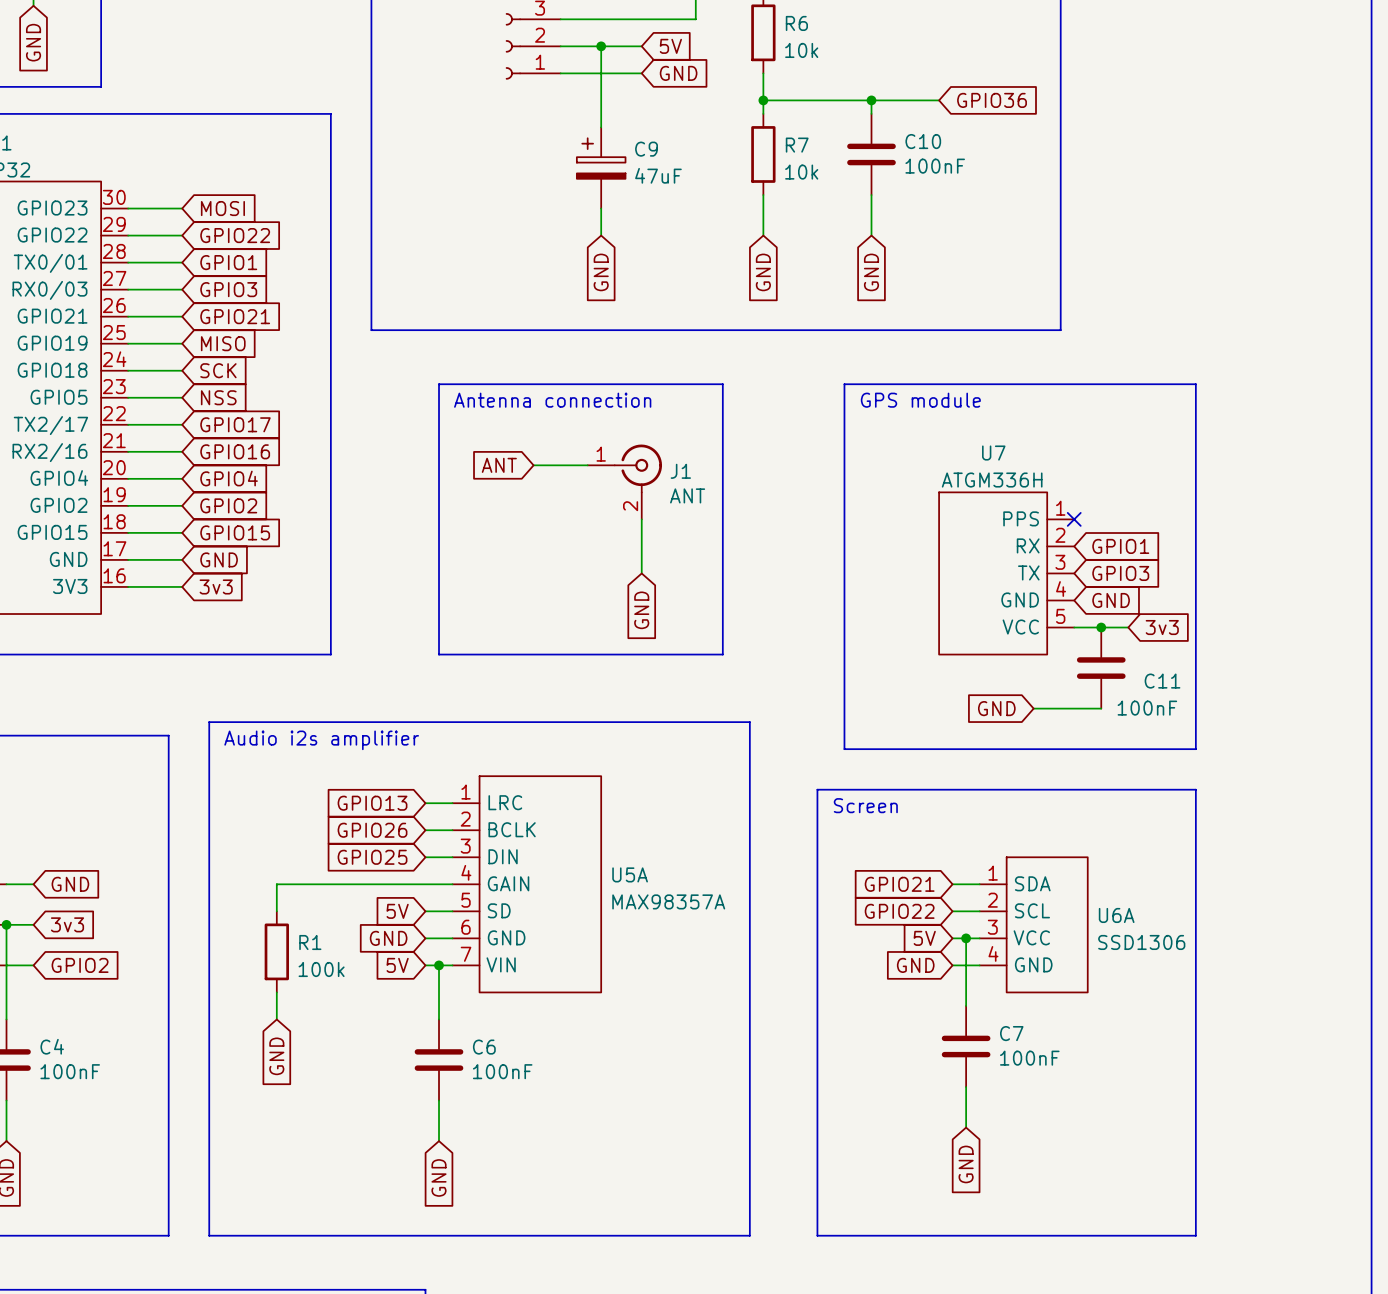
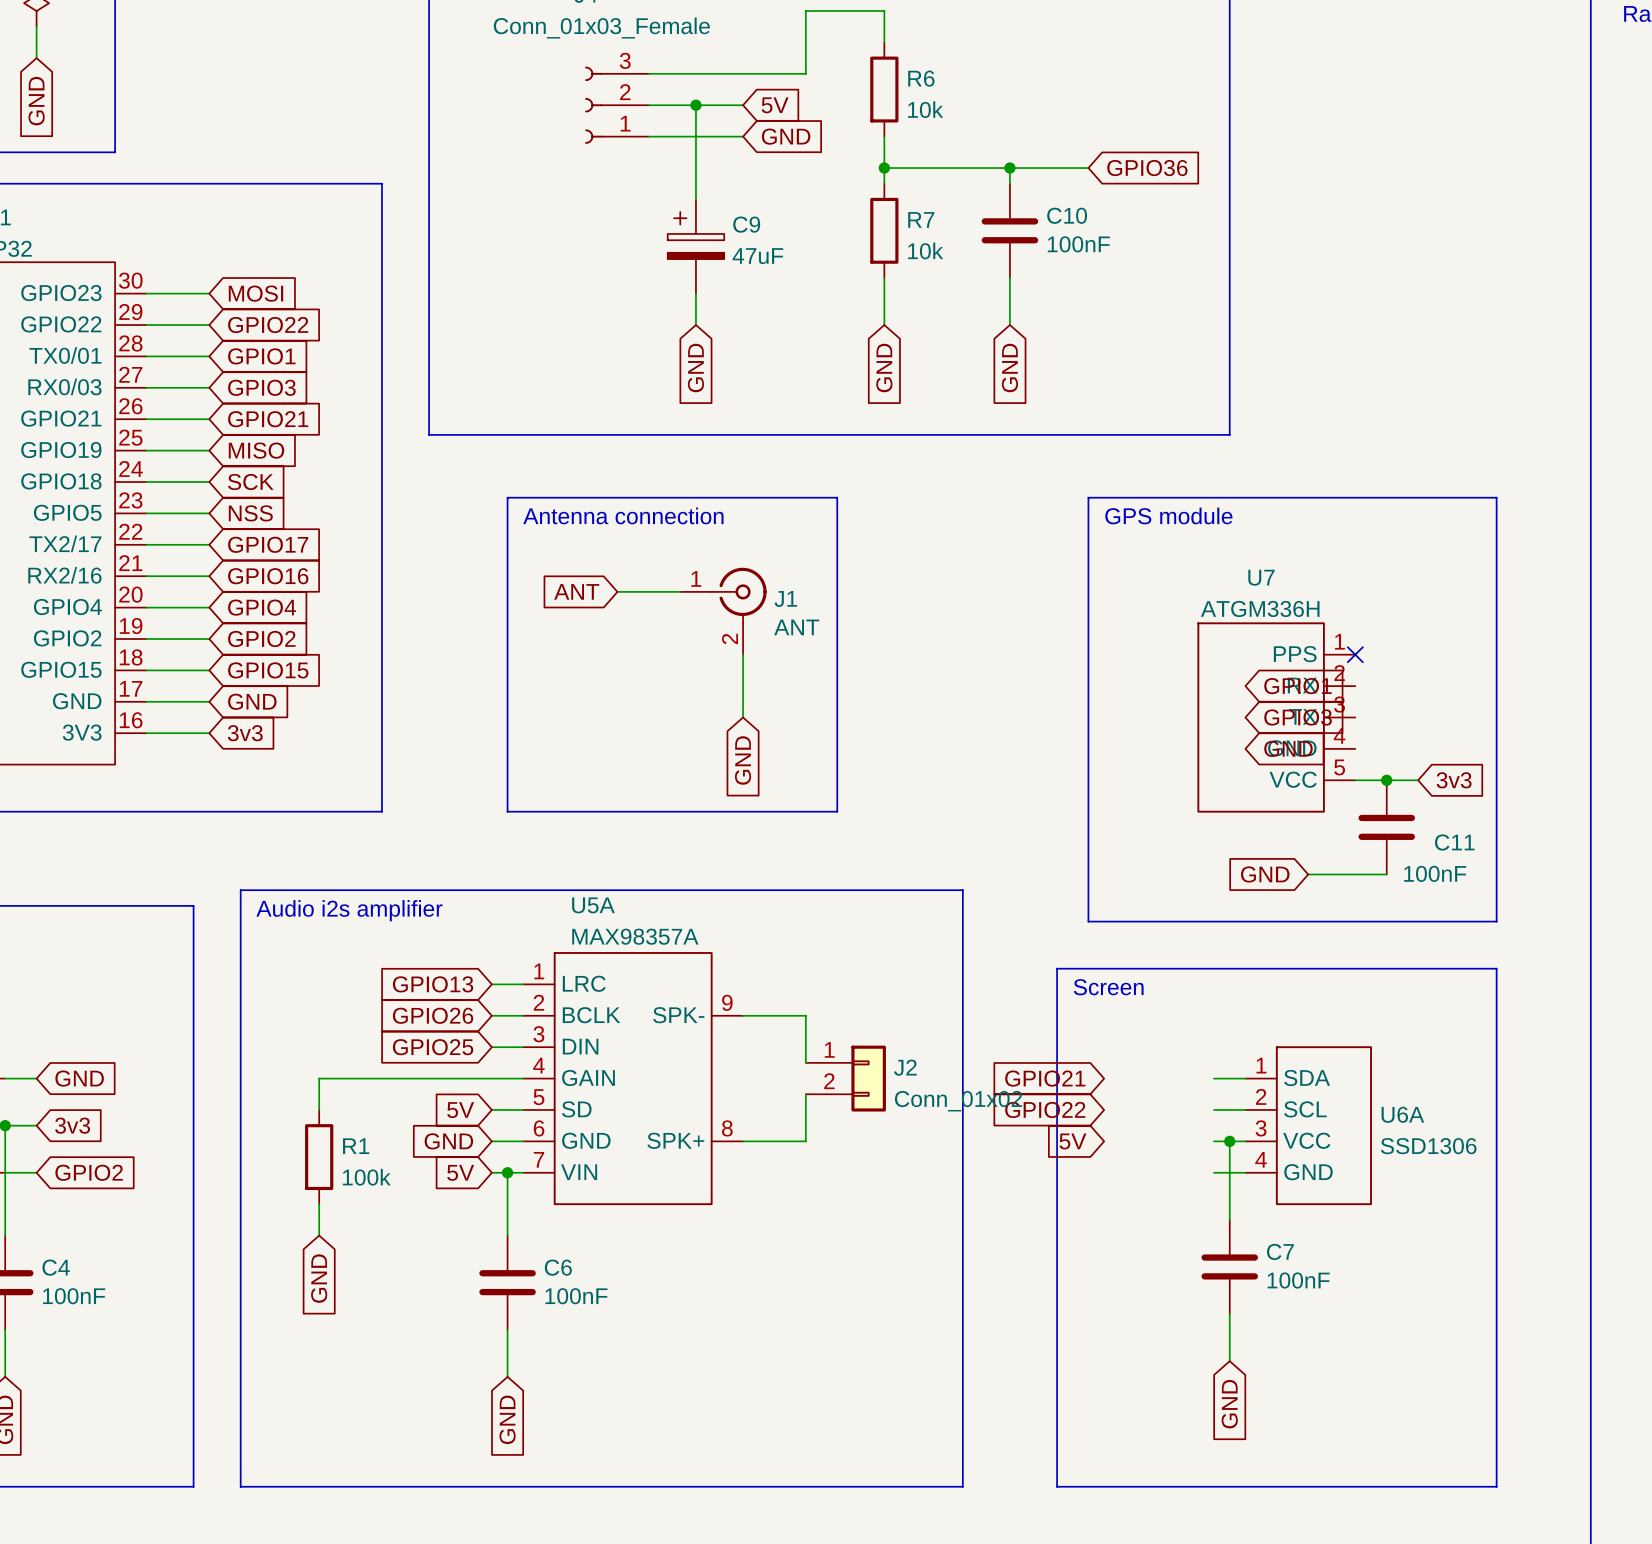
line: (939, 384) (844, 384) (844, 749) (939, 749) -> (1088, 497) (1088, 921)
line: (1195, 384) (1195, 749) -> (1386, 497) (1496, 497) (1496, 921) (1386, 921)
text position: GPS module (920, 400) -> GPS module (1168, 515)
no-connect mark: (1074, 519) -> none
no-connect mark: none -> (1355, 654)
U7 position: (1006, 573) -> (1276, 717)
wire: (1074, 627) (1128, 627) -> (1355, 780) (1418, 780)
junction: (1101, 627) -> none
global label position: 3v3 (1162, 627) -> 3v3 (1454, 780)
junction: none -> (1386, 780)
C11 position: (1101, 668) -> (1386, 827)
global label position: GND (996, 708) -> GND (1265, 874)
wire: (1033, 708) (1101, 708) -> (1308, 874) (1386, 874)
line: (749, 722) (749, 1235) -> (868, 890) (962, 890) (962, 1486)
U5A symbol: [452, 775, 603, 994] -> [523, 952, 744, 1206]
line: (912, 789) (817, 789) (817, 1235) -> (1057, 968) (1057, 1486)
line: (1195, 789) (1195, 1235) -> (1386, 968) (1496, 968) (1496, 1486) (1386, 1486)
text position: Screen (865, 805) -> Screen (1108, 987)
wire: none -> (743, 1015) (805, 1015) (805, 1062)
U5A name position: U5A (630, 874) -> U5A (593, 905)
J2: none -> Conn_01x02 (845, 1078)
wire: (952, 884) (979, 884) -> (1214, 1078) (1245, 1078)
wire: none -> (805, 1094) (805, 1141) (743, 1141)
U5A value position: MAX98357A (668, 901) -> MAX98357A (635, 936)
wire: (952, 911) (979, 911) -> (1214, 1109) (1245, 1109)
U6A position: (1034, 924) -> (1308, 1125)
wire: (952, 938) (979, 938) -> (1214, 1141) (1245, 1141)
wire: (966, 938) (966, 1005) -> (1229, 1141) (1229, 1219)
junction: (966, 938) -> none
junction: none -> (1229, 1141)
global label: GND (915, 965) -> none
wire: (952, 965) (979, 965) -> (1214, 1172) (1245, 1172)
C7 position: (966, 1046) -> (1229, 1266)
wire: (966, 1087) (966, 1127) -> (1229, 1314) (1229, 1361)
global label position: GND (966, 1164) -> GND (1229, 1404)
line: none -> (868, 1486) (947, 1486)
line: (830, 1235) (912, 1235) -> none

